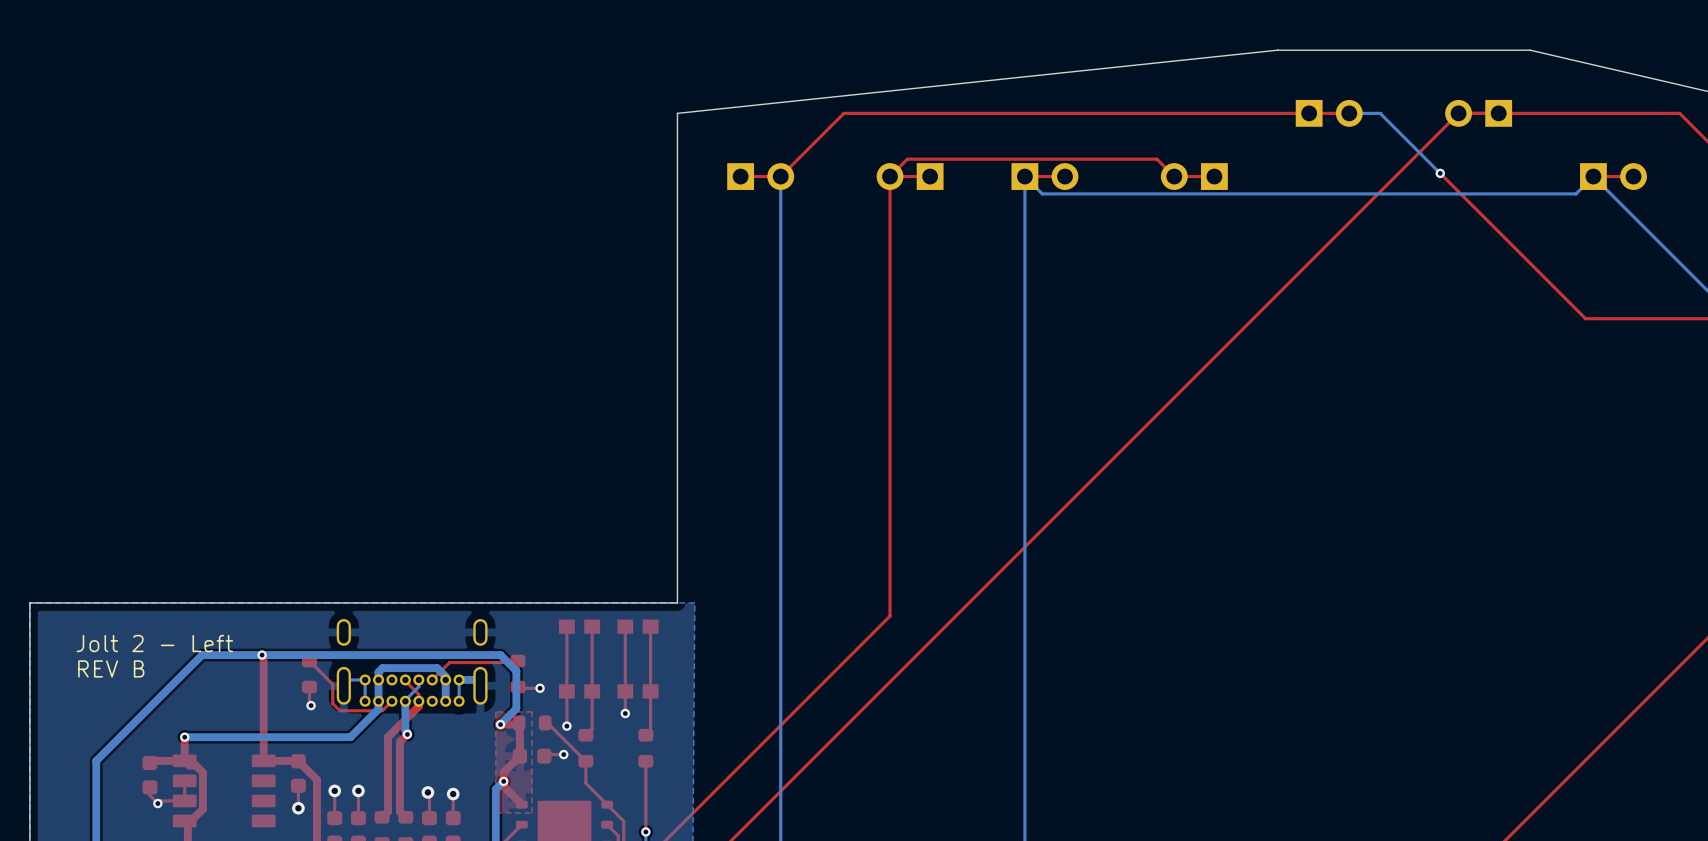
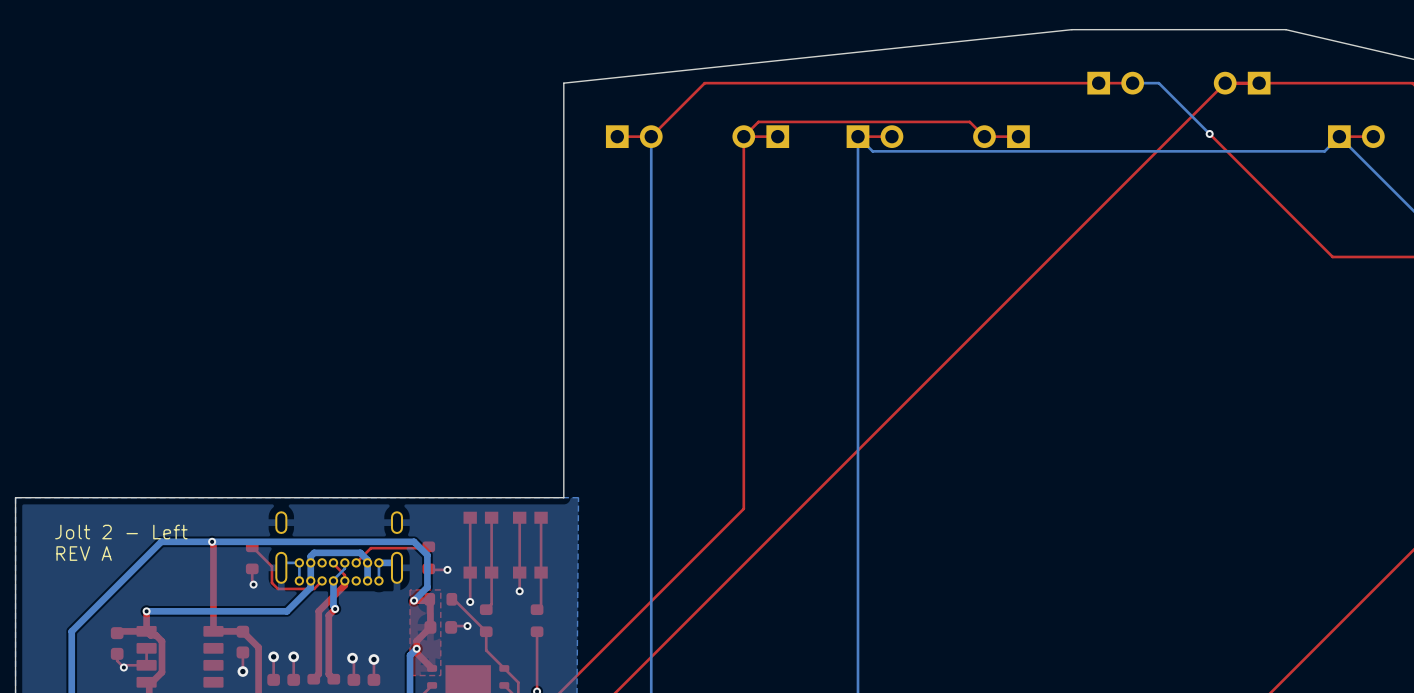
text: REV B (111, 668) -> REV A (84, 553)

